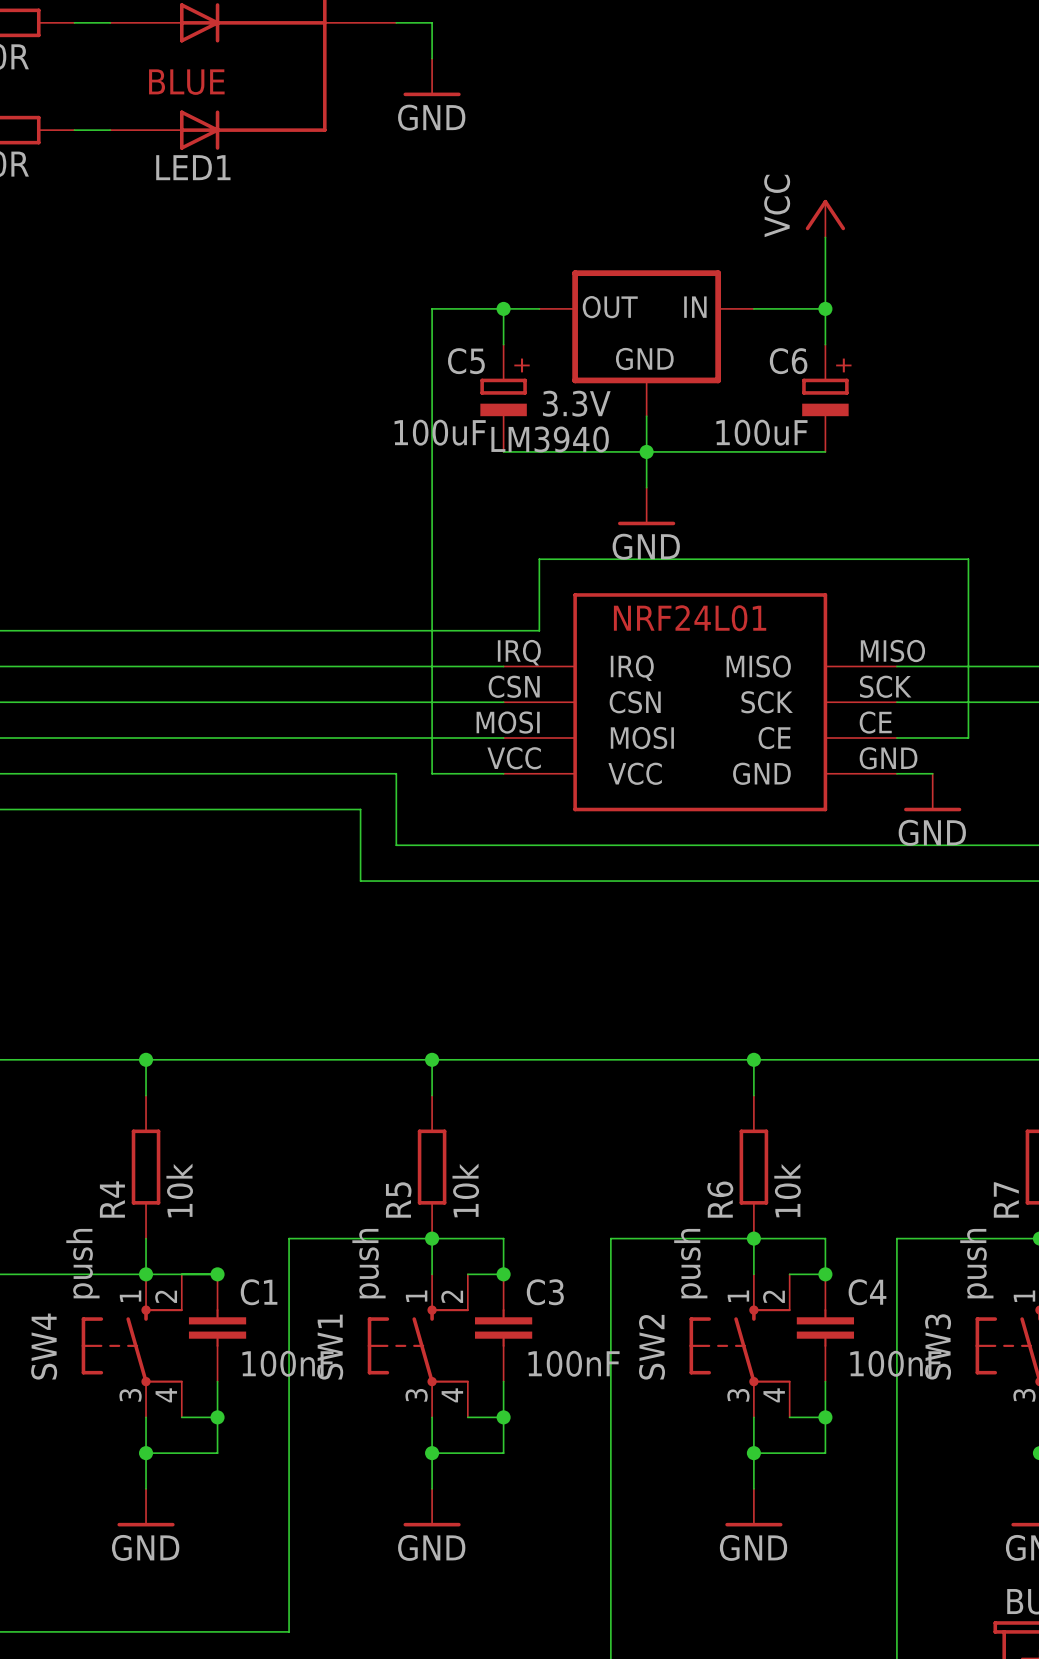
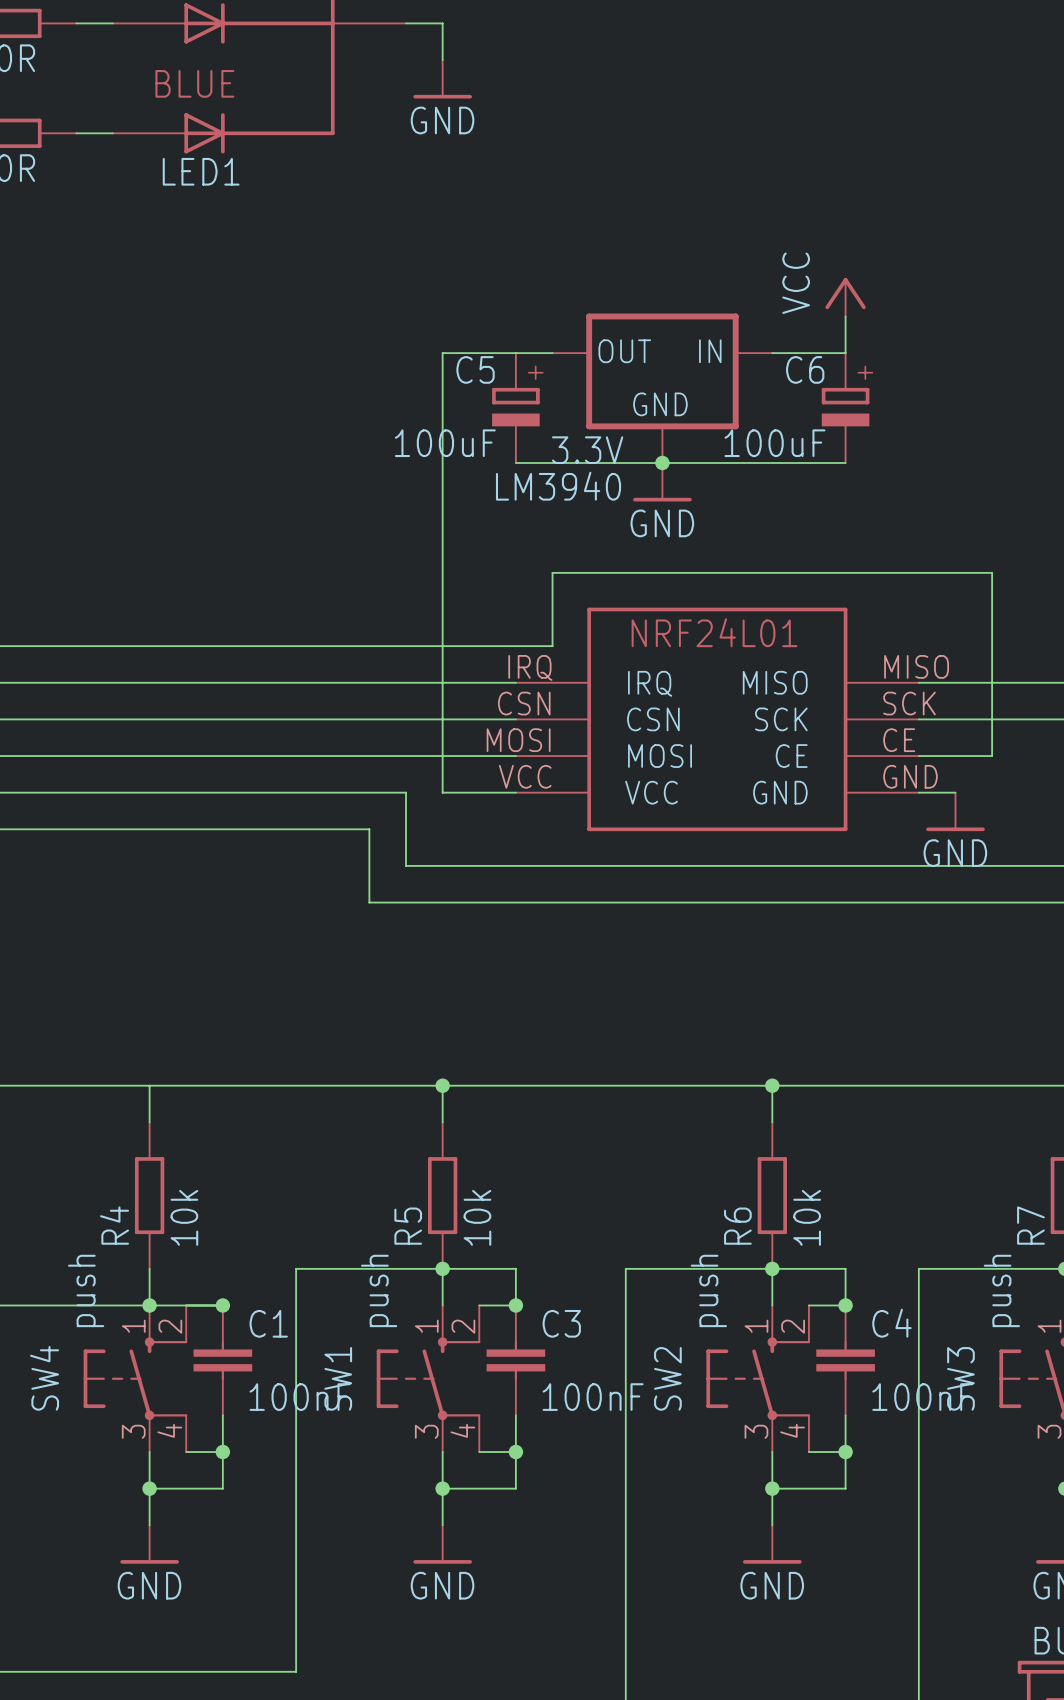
power symbol position: VCC (825, 218) -> VCC (845, 297)
wire: (825, 237) (825, 308) (753, 308) -> none
wire: (503, 308) (503, 344) -> none
junction: (503, 308) -> none
wire: (539, 308) (432, 308) (432, 344) -> (552, 353) (442, 353)
junction: (825, 308) -> none
3.3V position: (646, 343) -> (662, 388)
wire: none -> (772, 353) (845, 353)
power symbol position: GND (646, 506) -> GND (662, 482)
junction: (146, 1059) -> none

